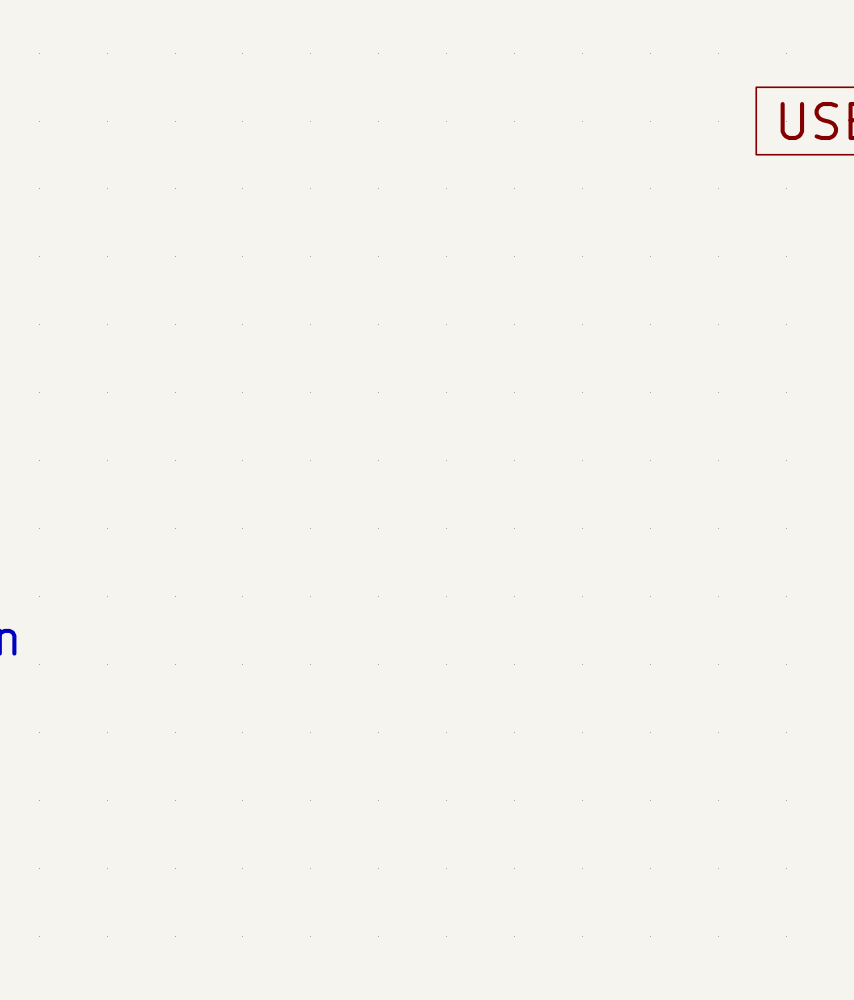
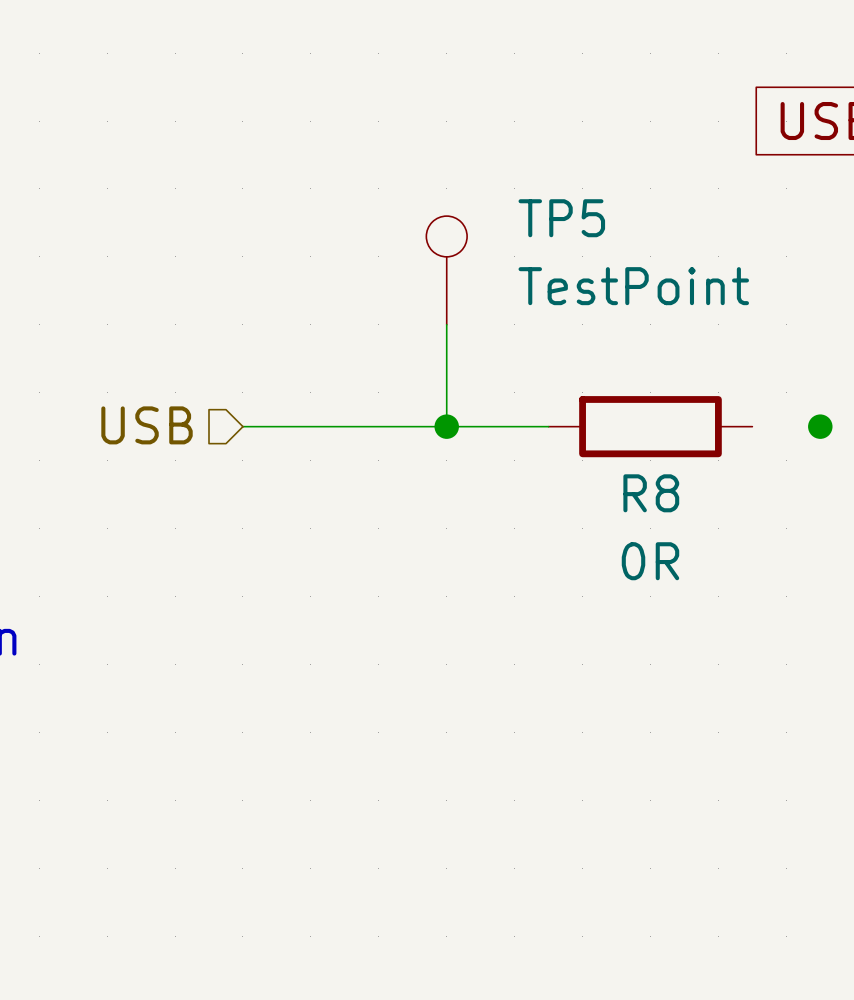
TP5: none -> TestPoint (446, 270)
wire: none -> (446, 324) (446, 426)
hierarchical label: none -> USB (147, 425)
wire: none -> (242, 426) (548, 426)
junction: none -> (446, 426)
R8: none -> 0R (650, 426)
junction: none -> (820, 426)

